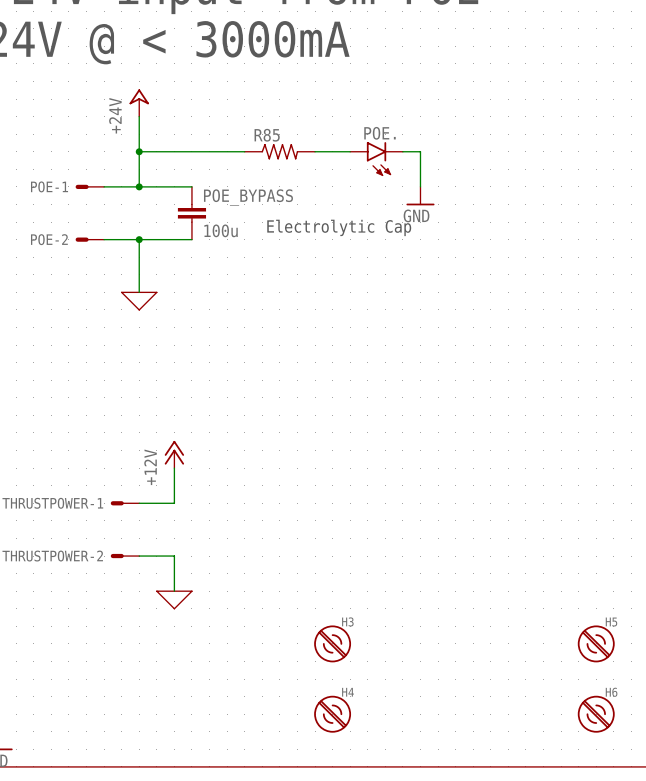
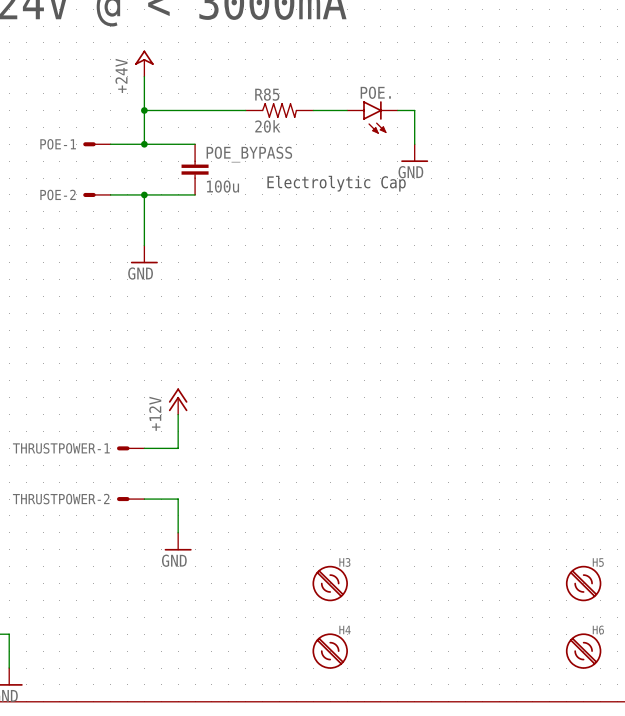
R85 value: none -> 20k (267, 126)
power symbol shape: [121, 291, 158, 311] -> [130, 245, 158, 264]
power symbol text: none -> GND (140, 273)
power symbol shape: [156, 590, 193, 610] -> [164, 532, 192, 551]
power symbol text: none -> GND (174, 560)

